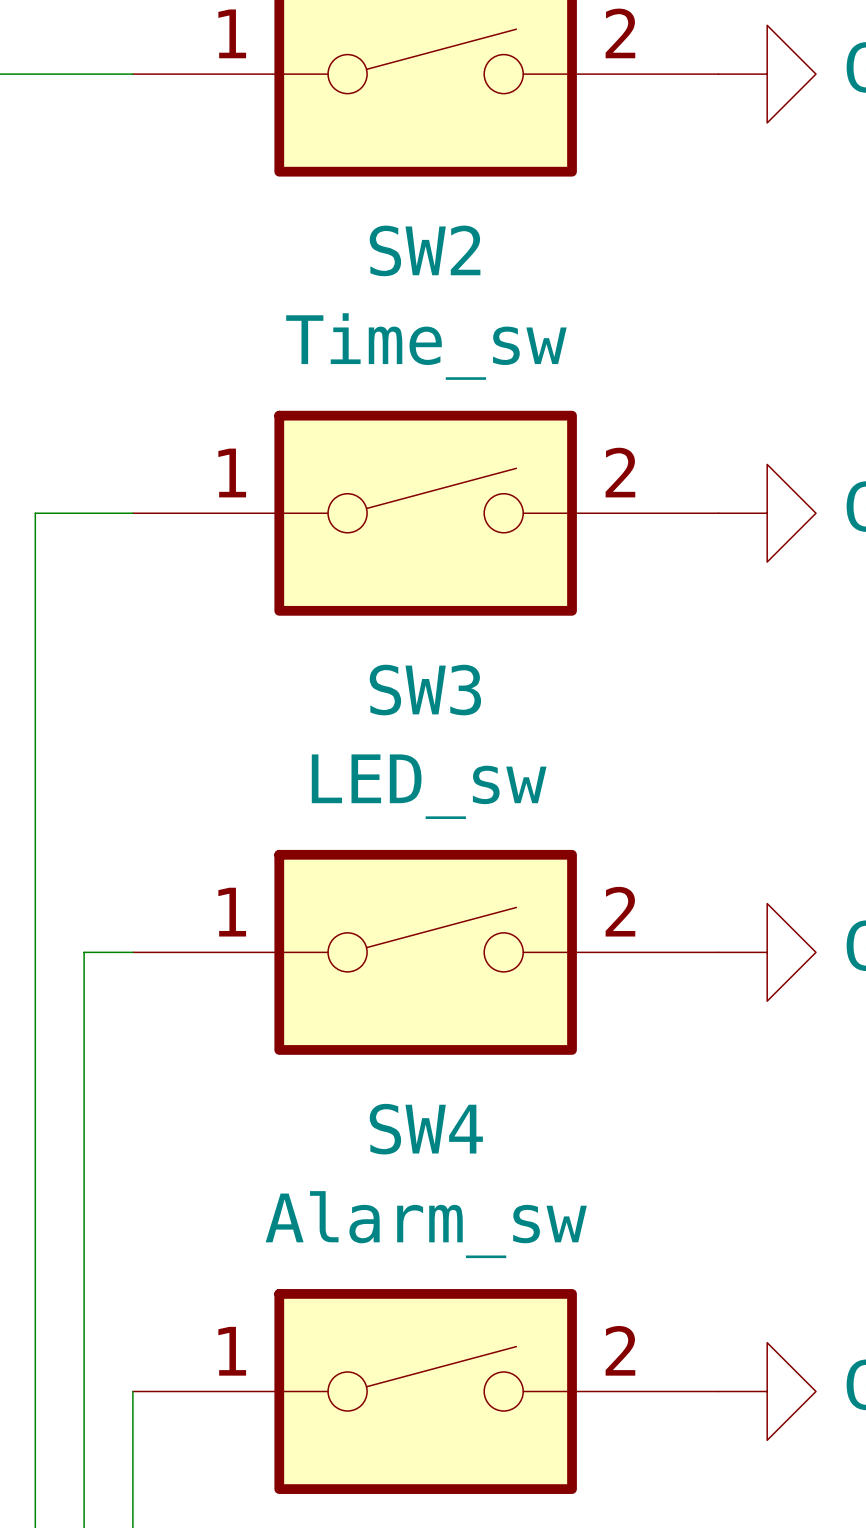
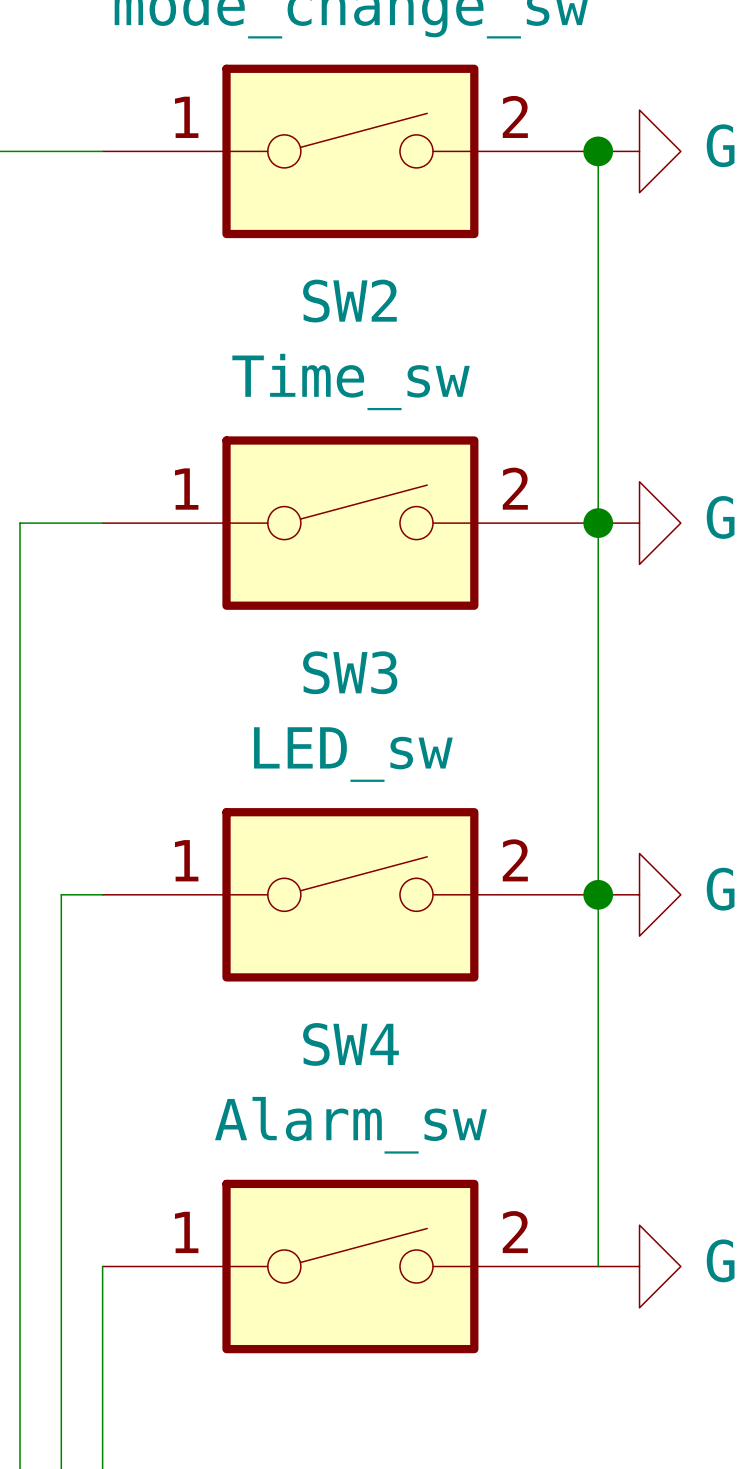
wire: none -> (598, 151) (598, 1266)
junction: none -> (598, 151)
junction: none -> (598, 523)
junction: none -> (598, 894)

